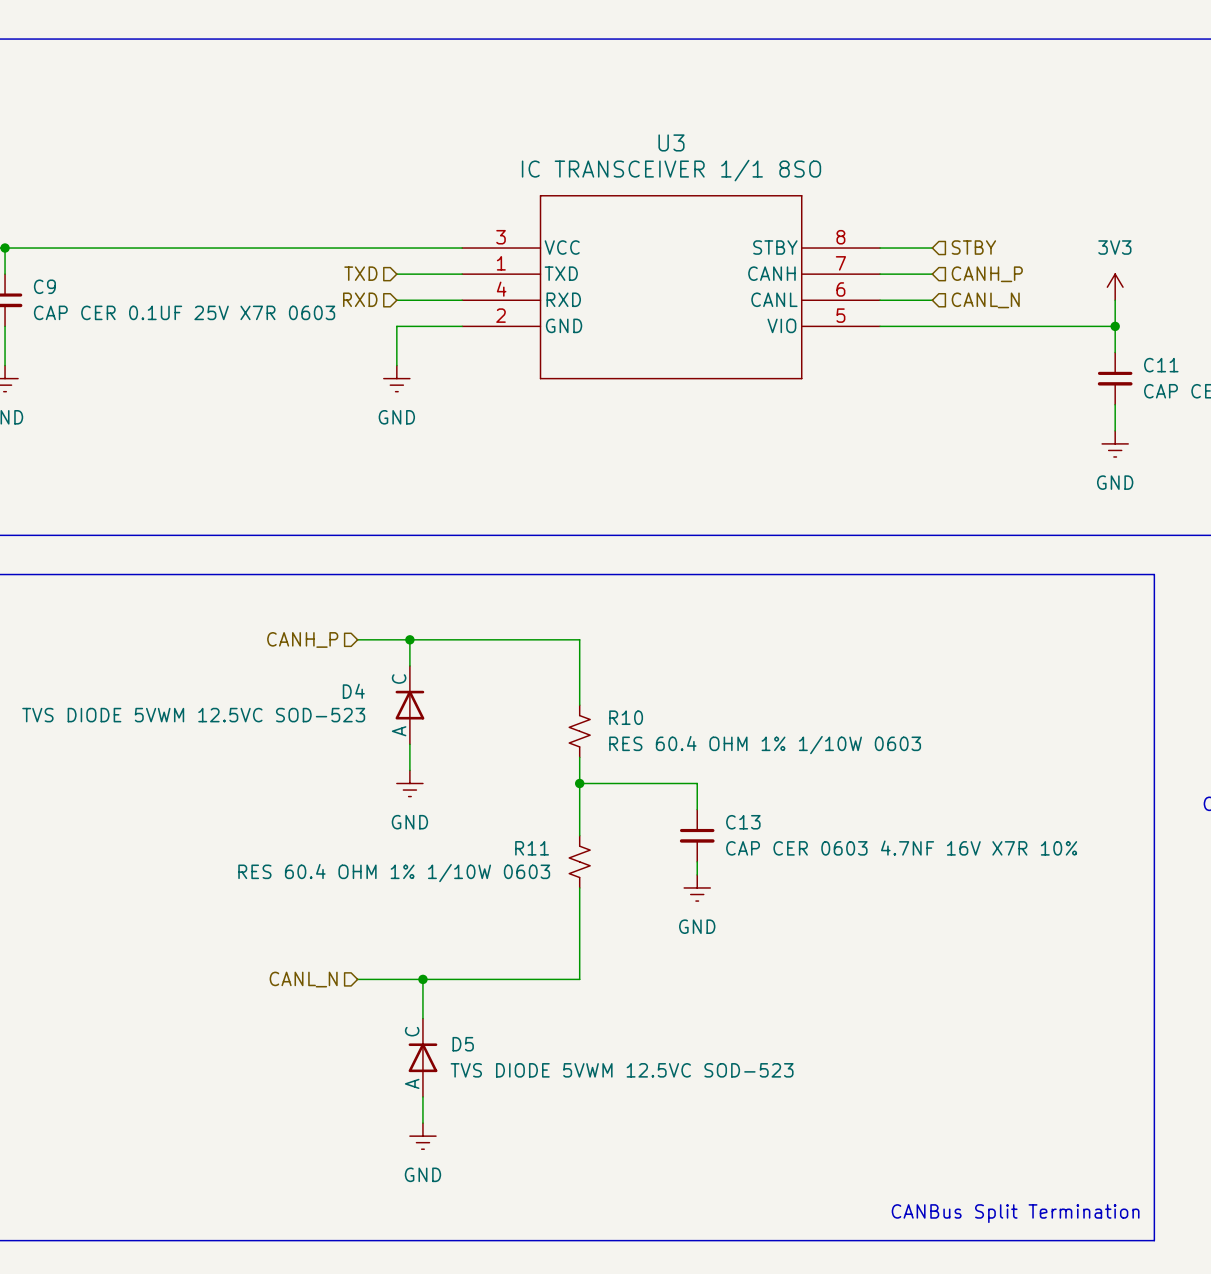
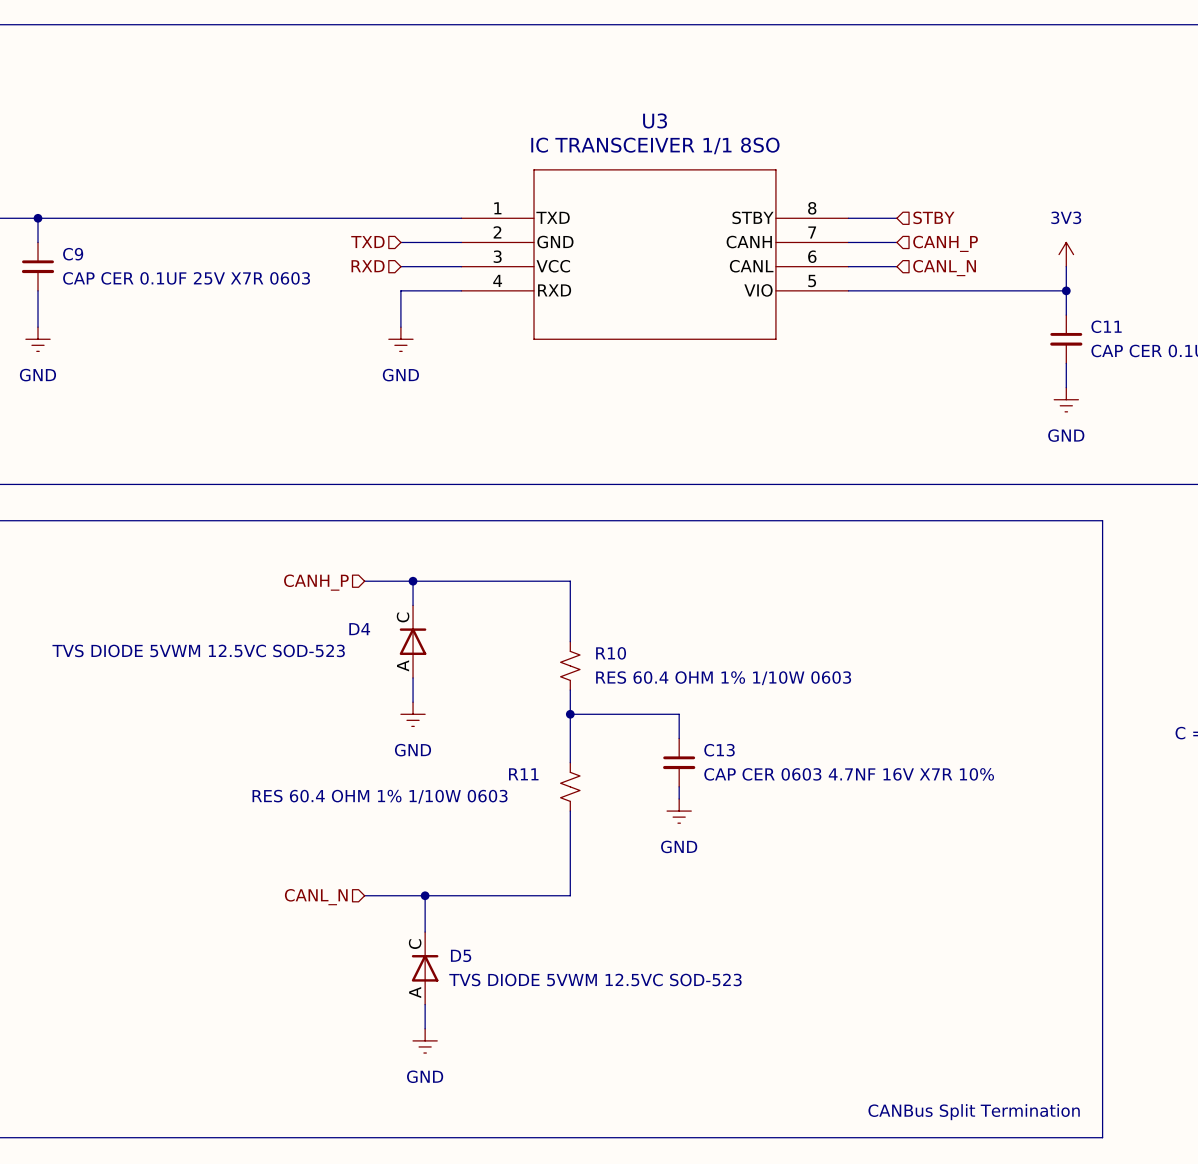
U3 pin number: 3 (501, 237) -> 1 (497, 208)
U3 pin name: VCC (562, 247) -> TXD (553, 217)
U3 pin number: 1 (501, 263) -> 2 (497, 232)
U3 pin name: TXD (561, 273) -> GND (555, 242)
U3 pin number: 4 (501, 289) -> 3 (497, 256)
U3 pin name: RXD (563, 299) -> VCC (553, 266)
U3 pin number: 2 (501, 315) -> 4 (497, 280)
U3 pin name: GND (564, 325) -> RXD (554, 290)

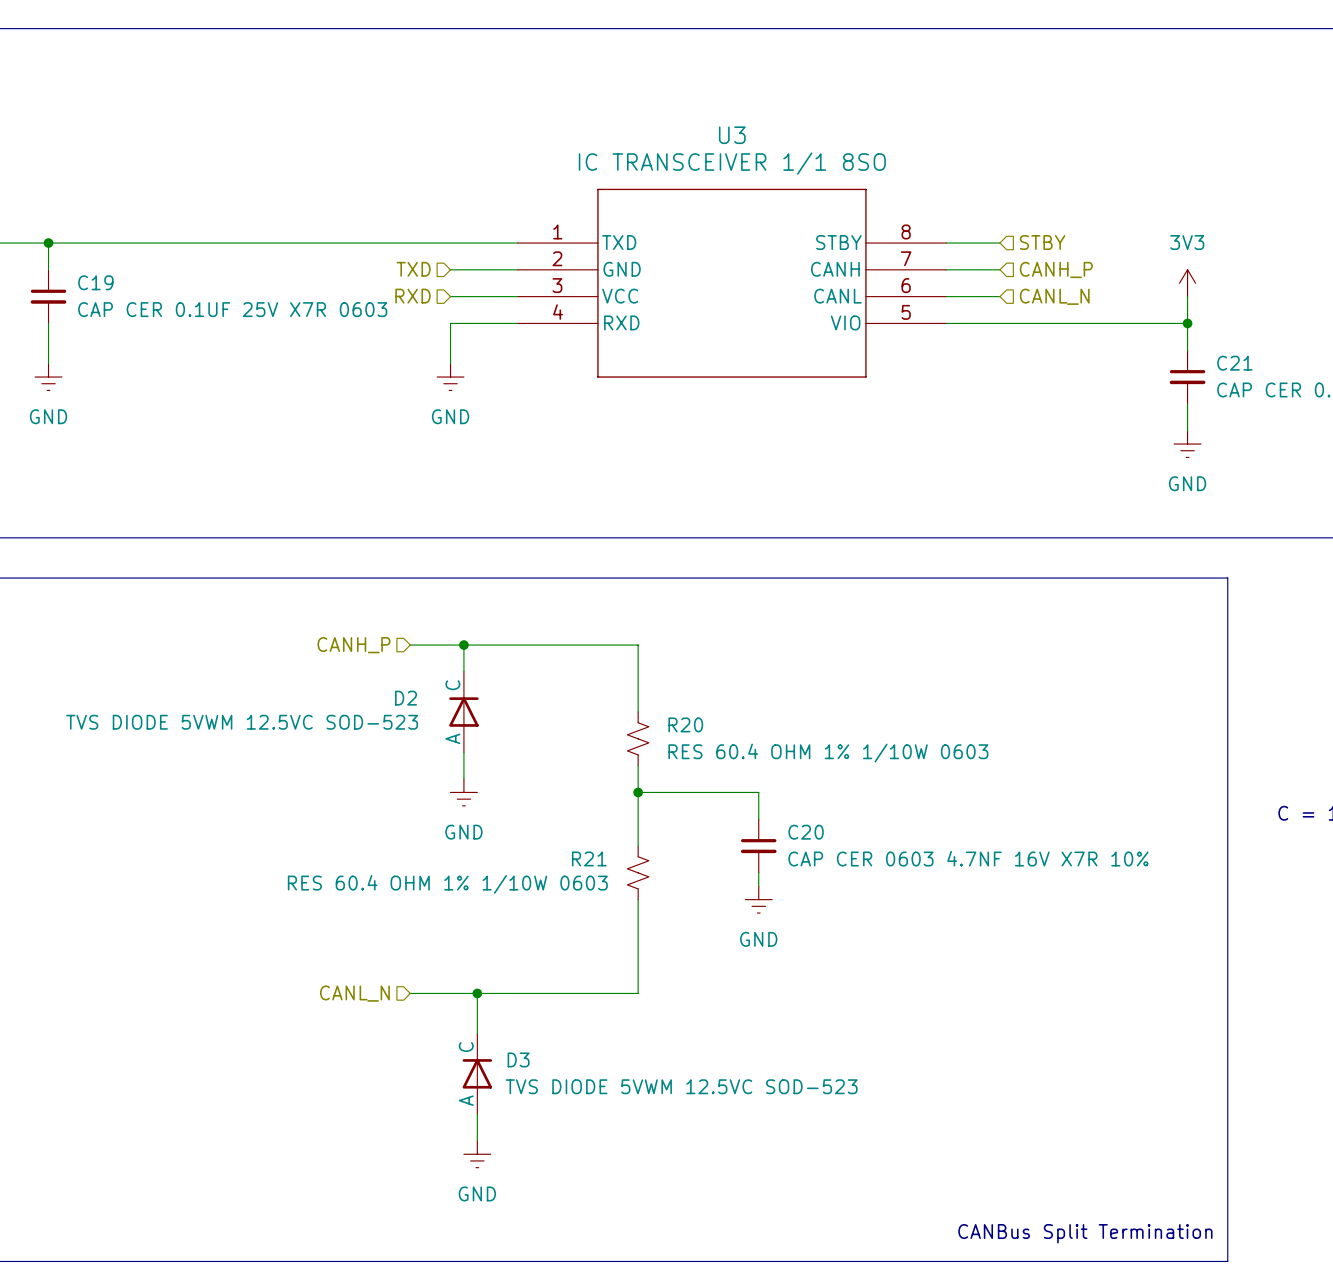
C9 name: C9 (73, 254) -> C19 (95, 282)
C11 name: C11 (1106, 326) -> C21 (1234, 363)
D4 name: D4 (359, 629) -> D2 (406, 698)
R10 name: R10 (611, 653) -> R20 (685, 724)
C13 name: C13 (719, 750) -> C20 (806, 832)
R11 name: R11 (523, 774) -> R21 (589, 858)
D5 name: D5 (461, 955) -> D3 (518, 1059)

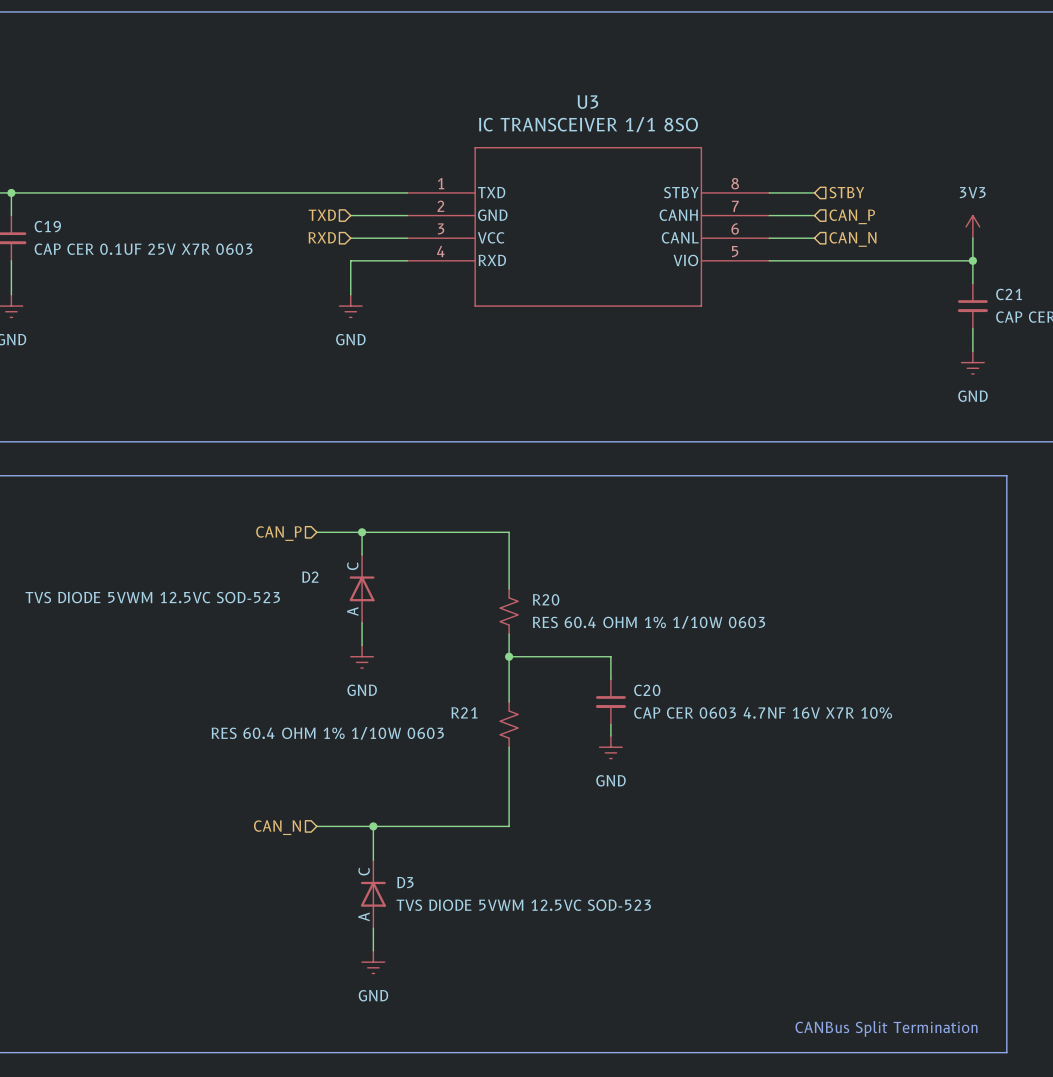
hierarchical label: CANH_P (1056, 269) -> CAN_P (852, 216)
hierarchical label: CANL_N (1054, 296) -> CAN_N (853, 239)
hierarchical label: CANH_P (353, 645) -> CAN_P (278, 533)
hierarchical label: CANL_N (354, 993) -> CAN_N (277, 827)

